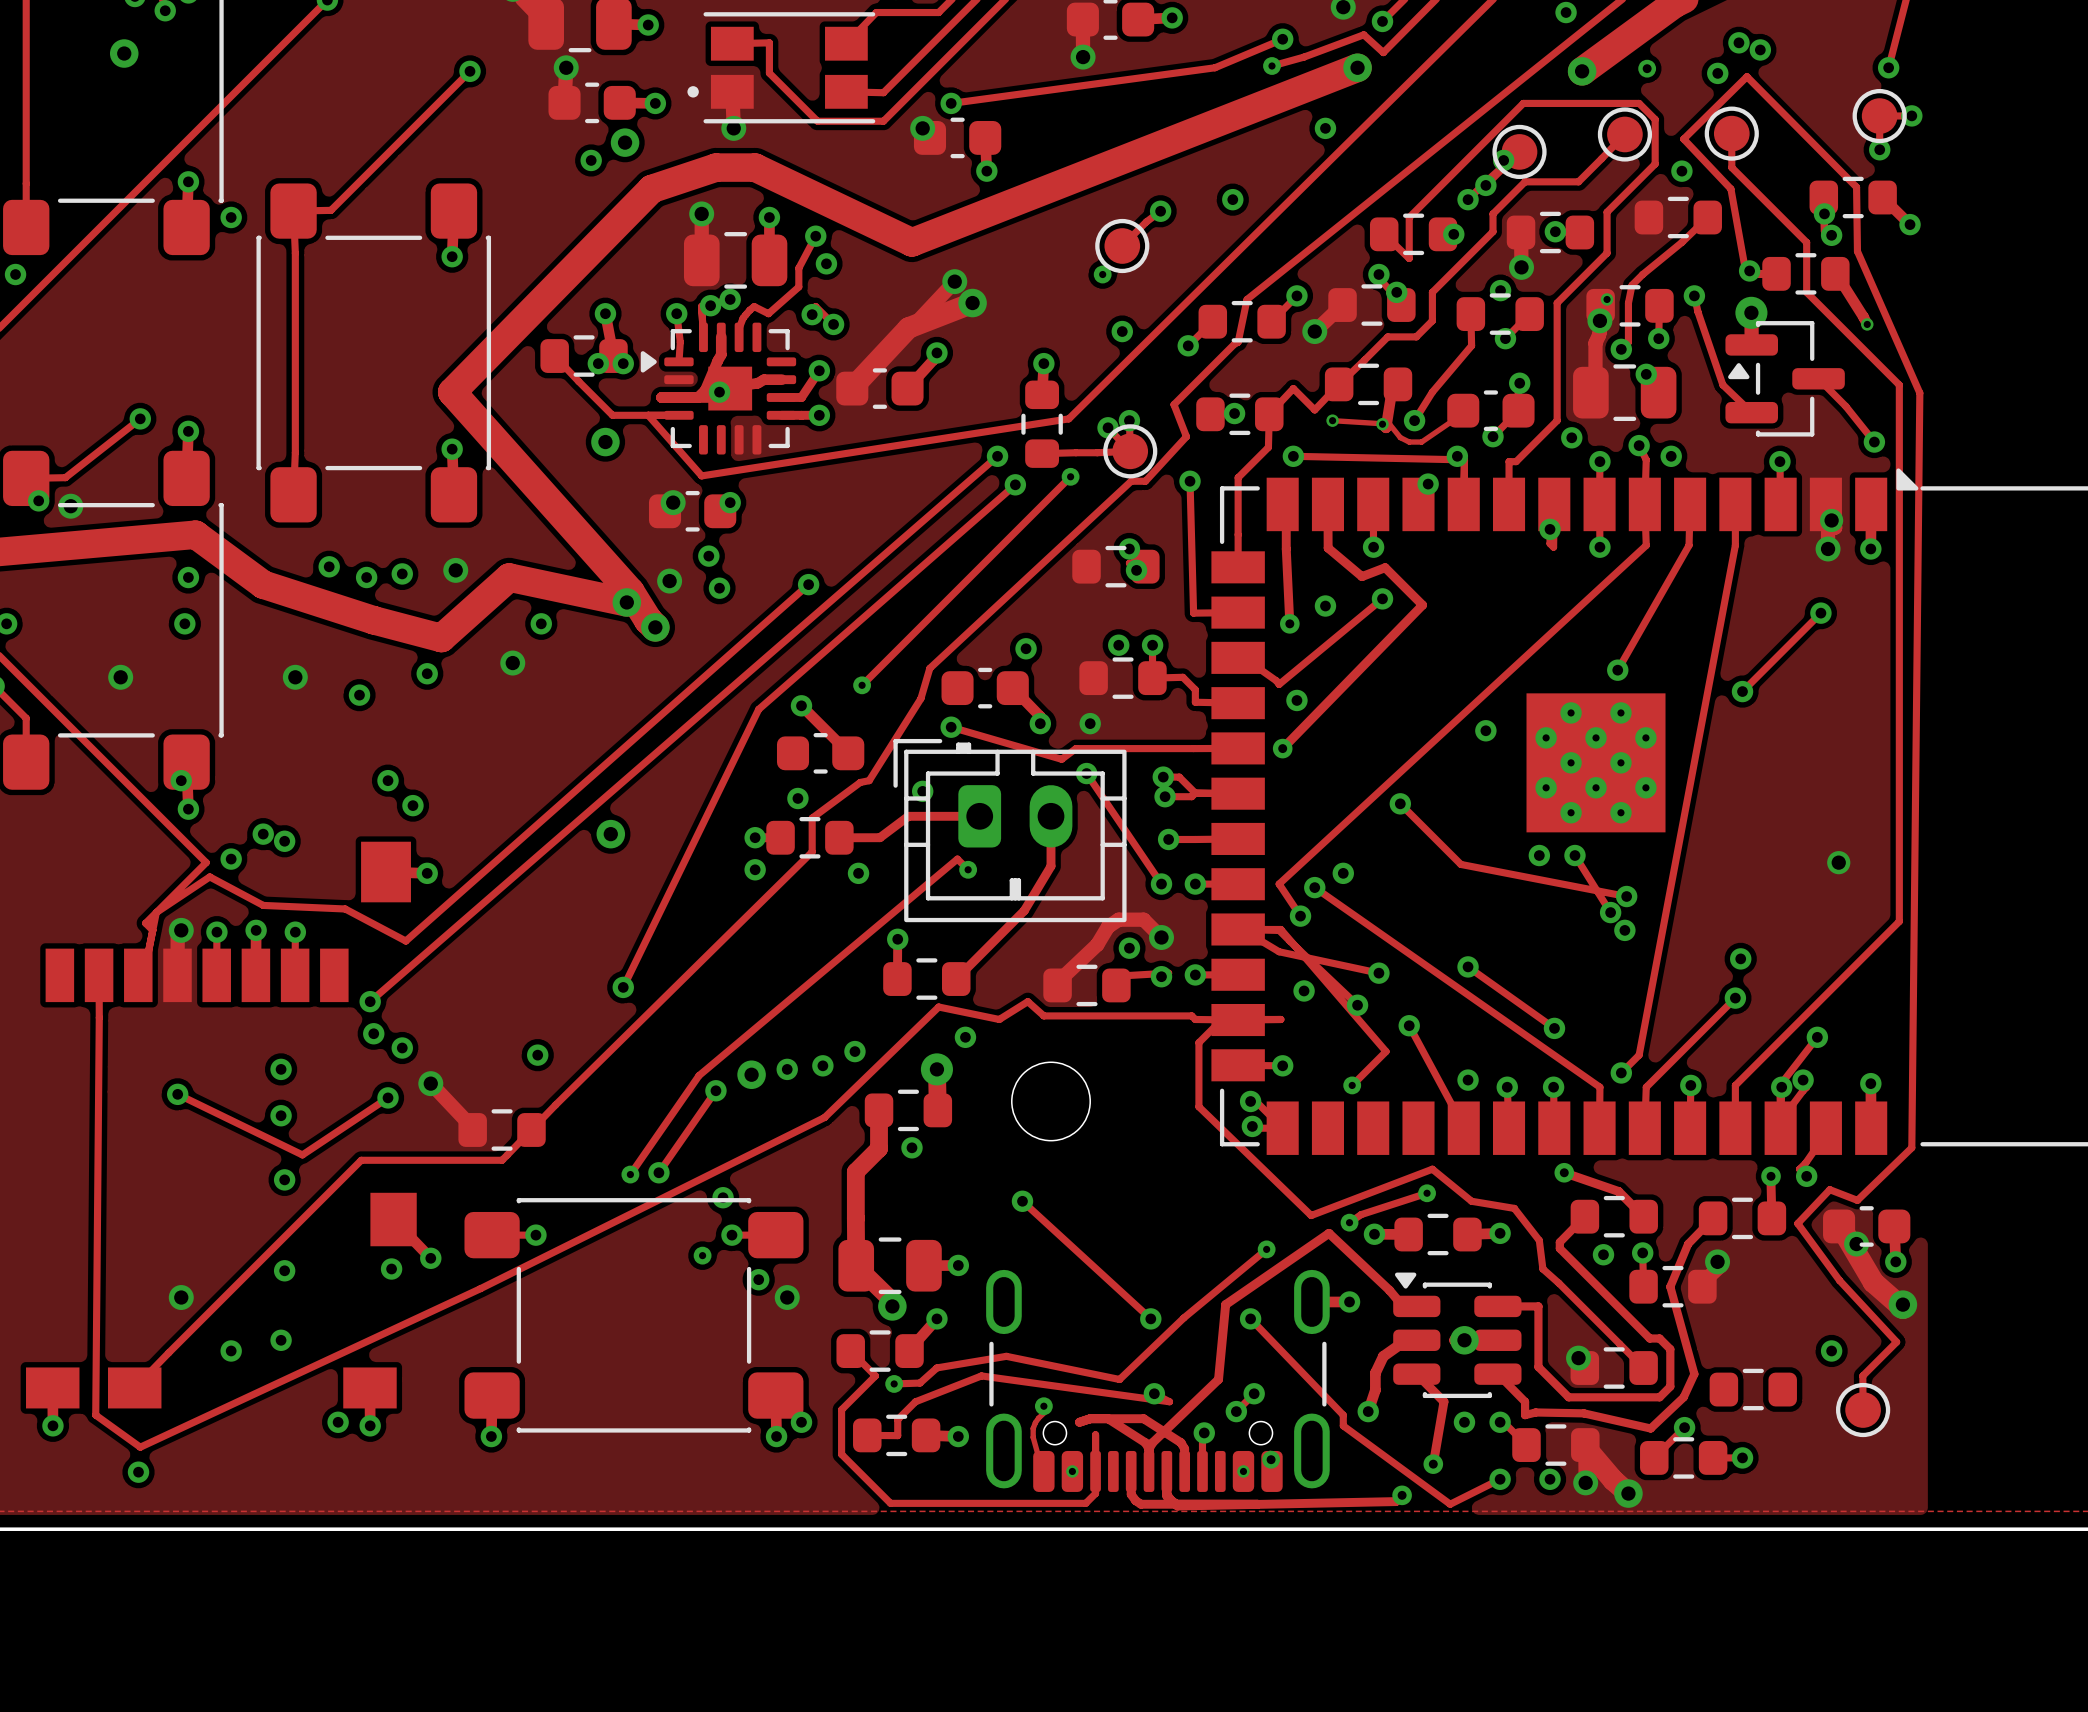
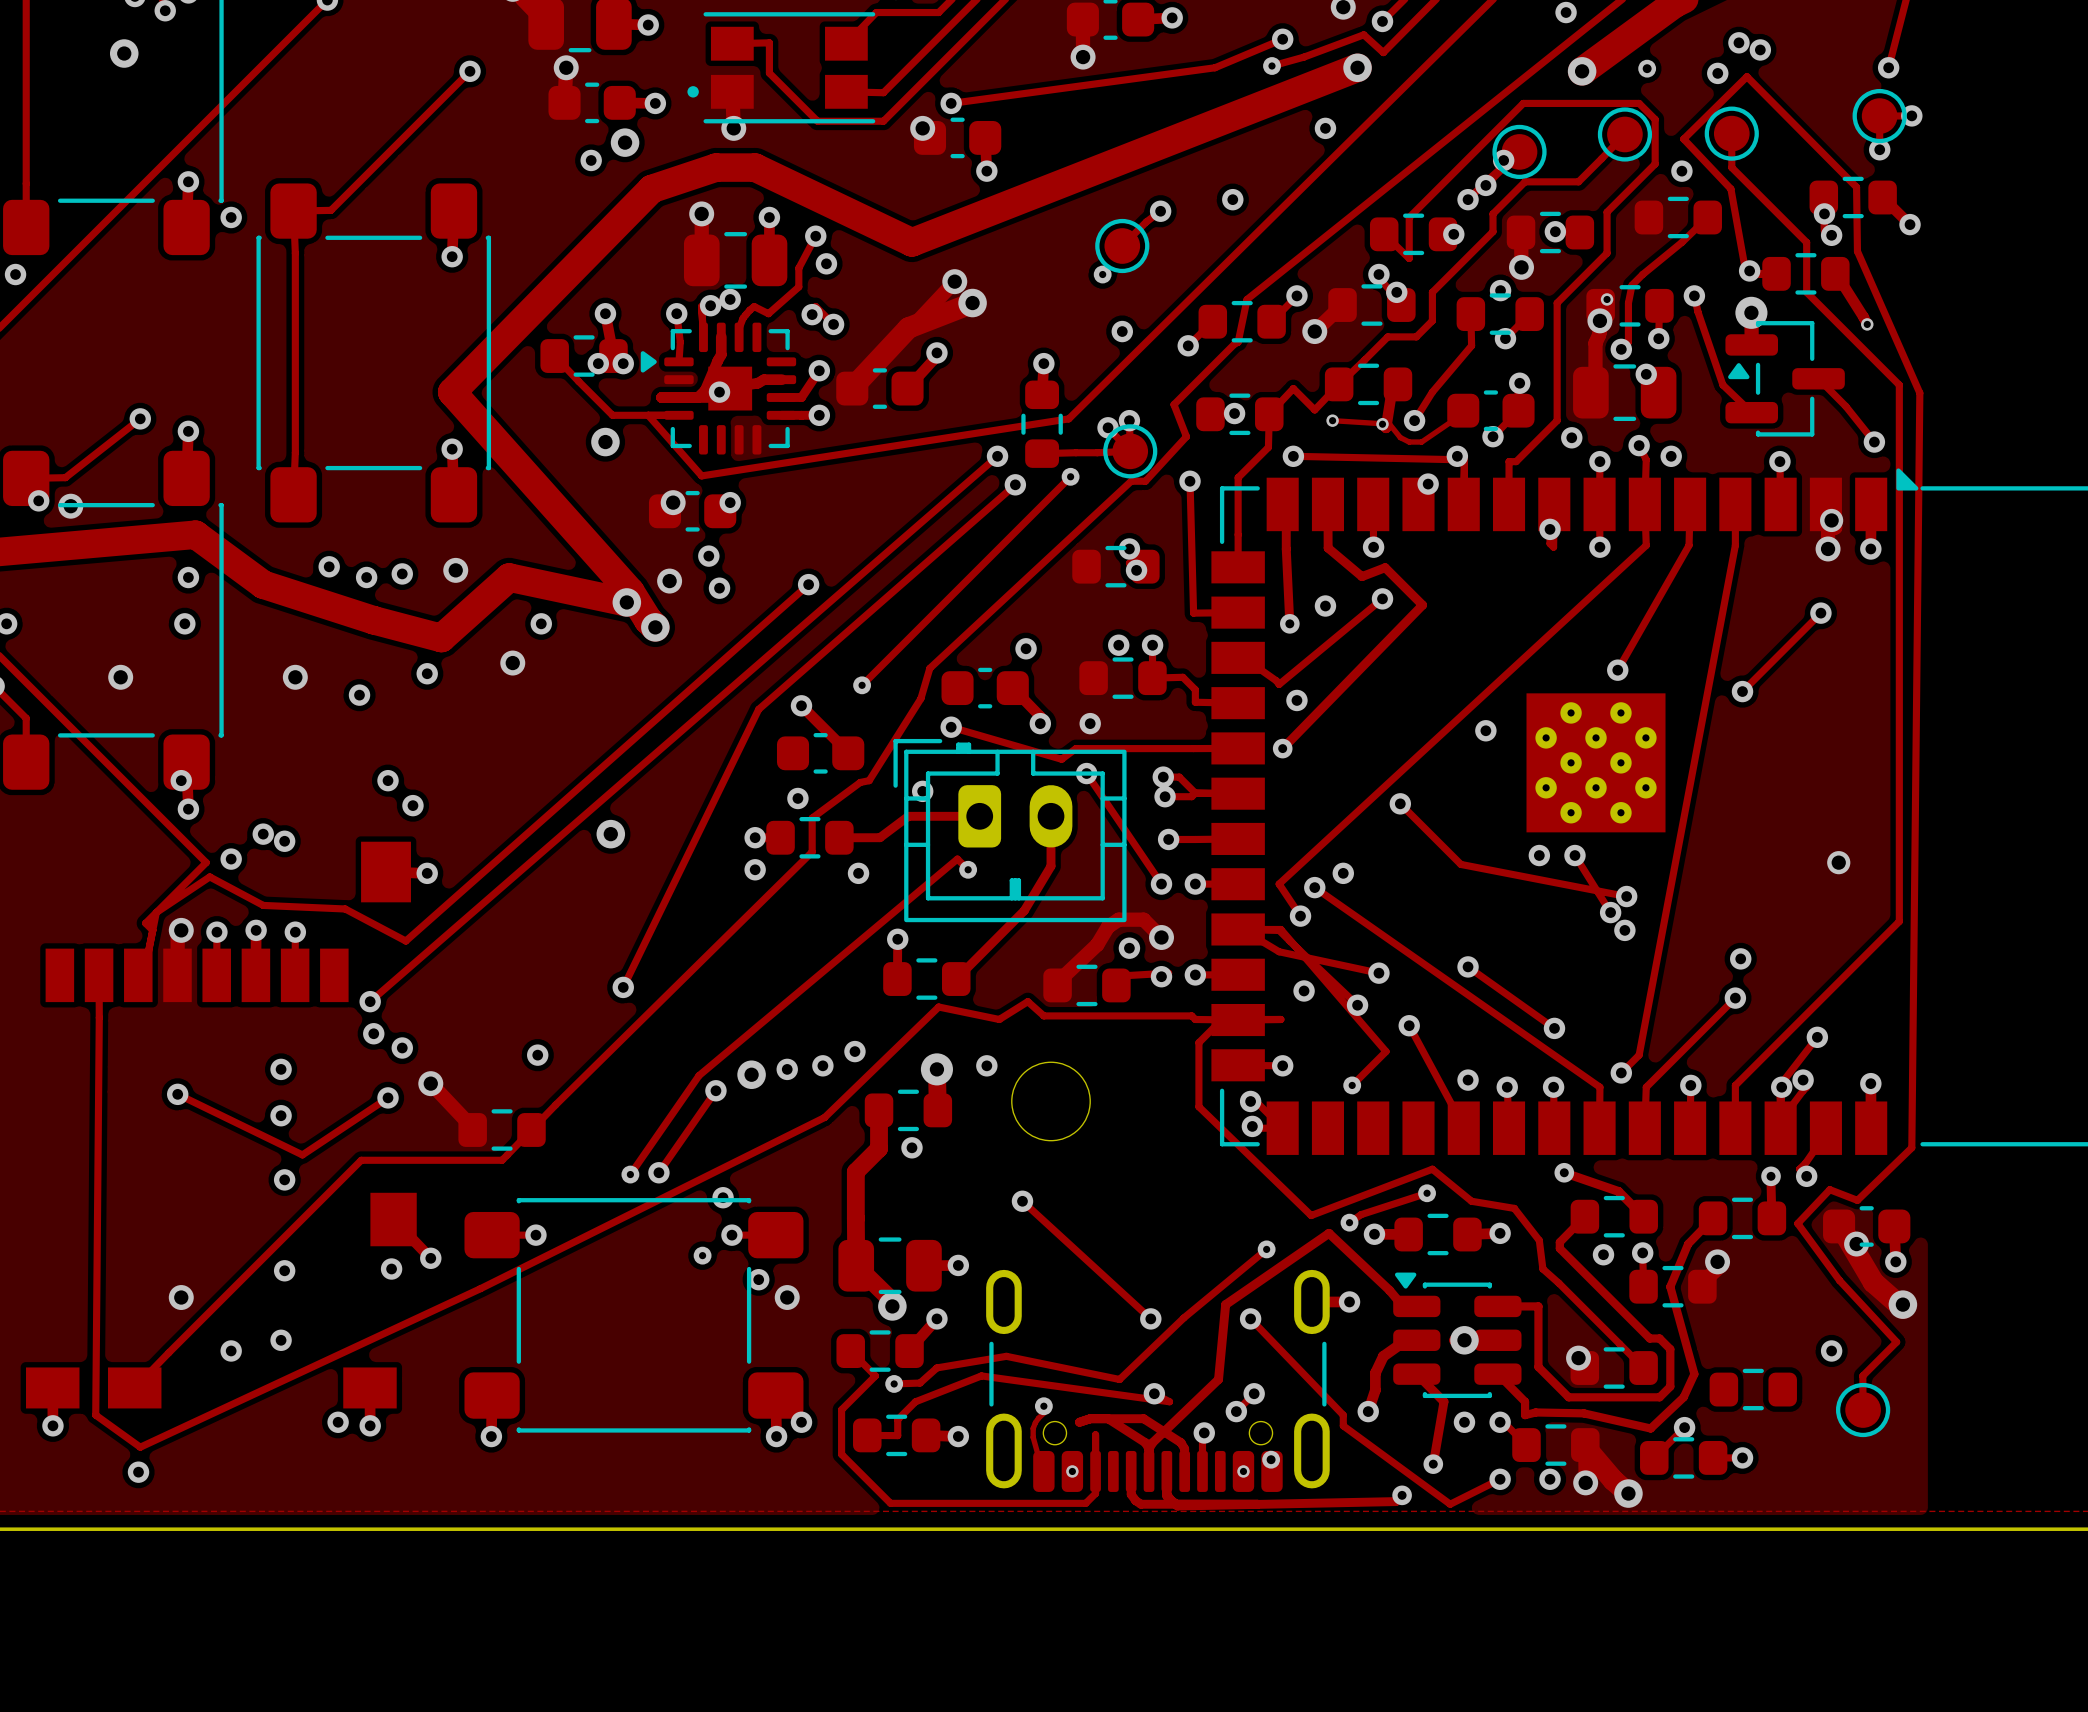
via position: (965, 1037) -> (986, 1065)

